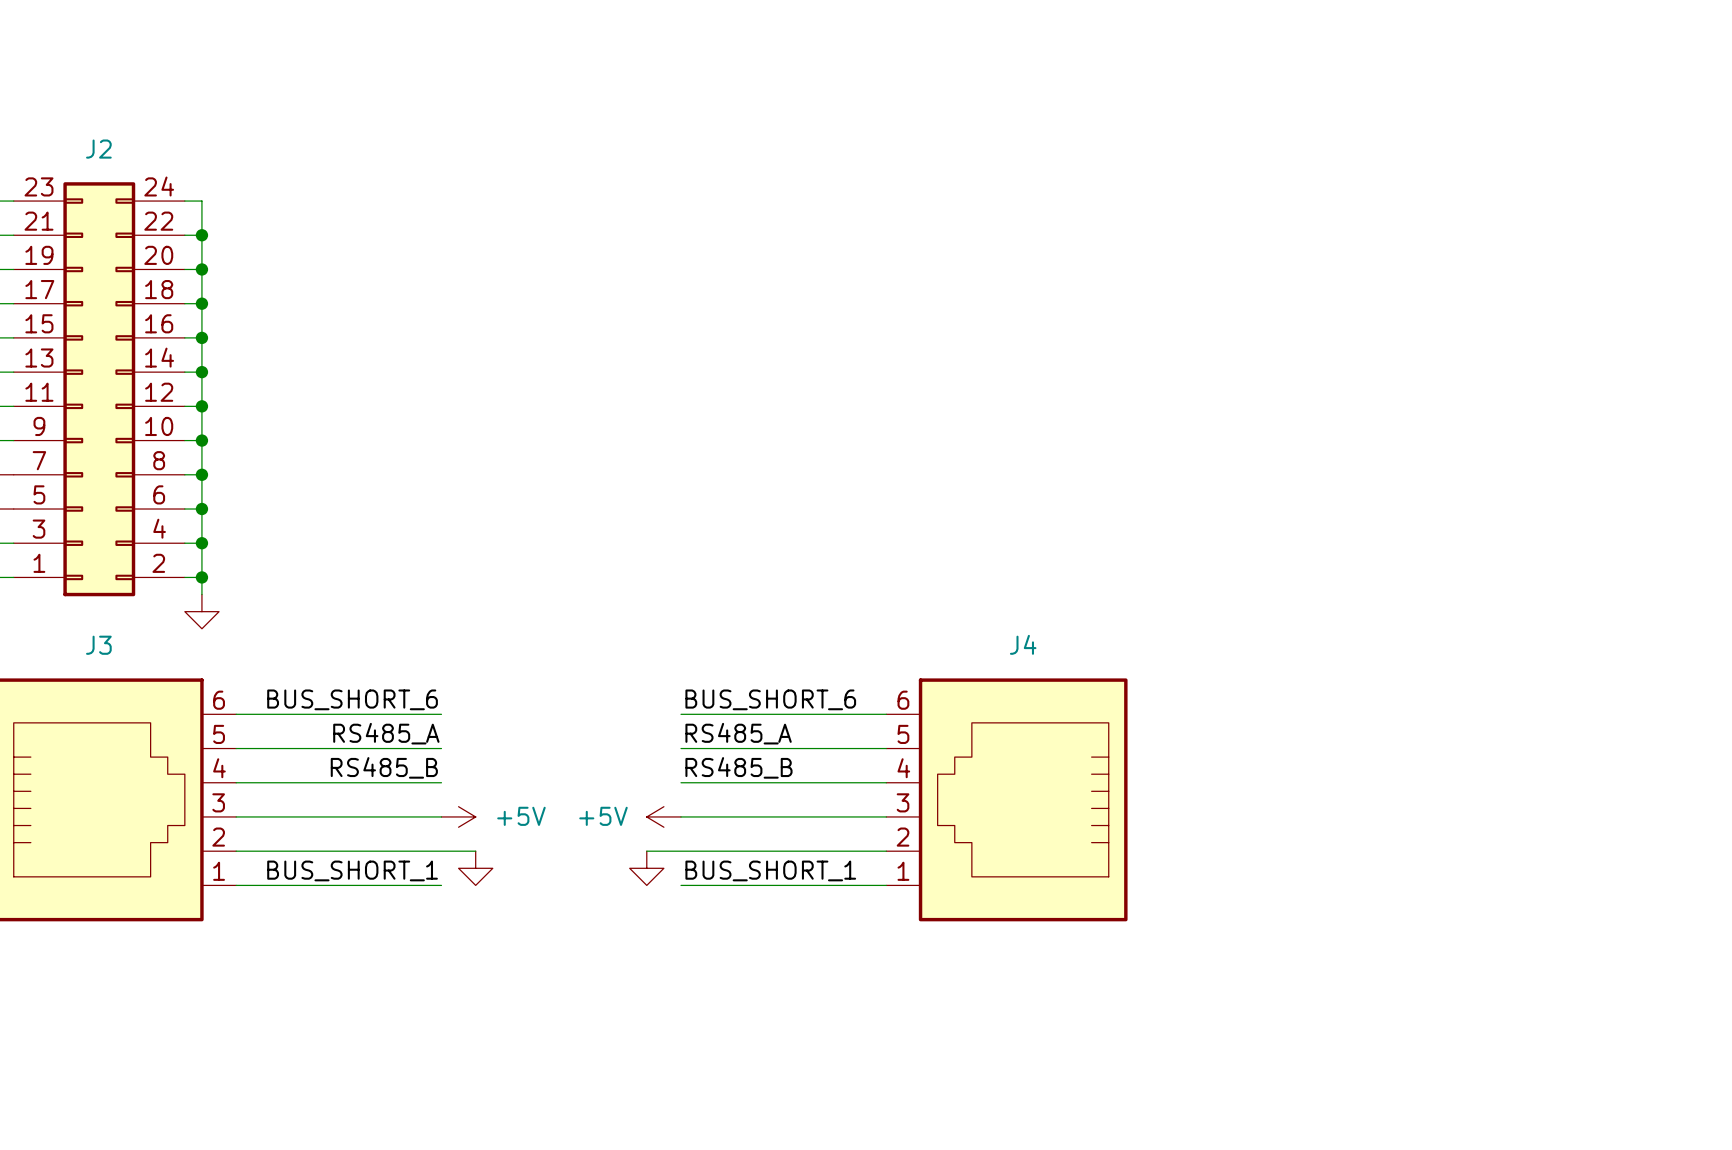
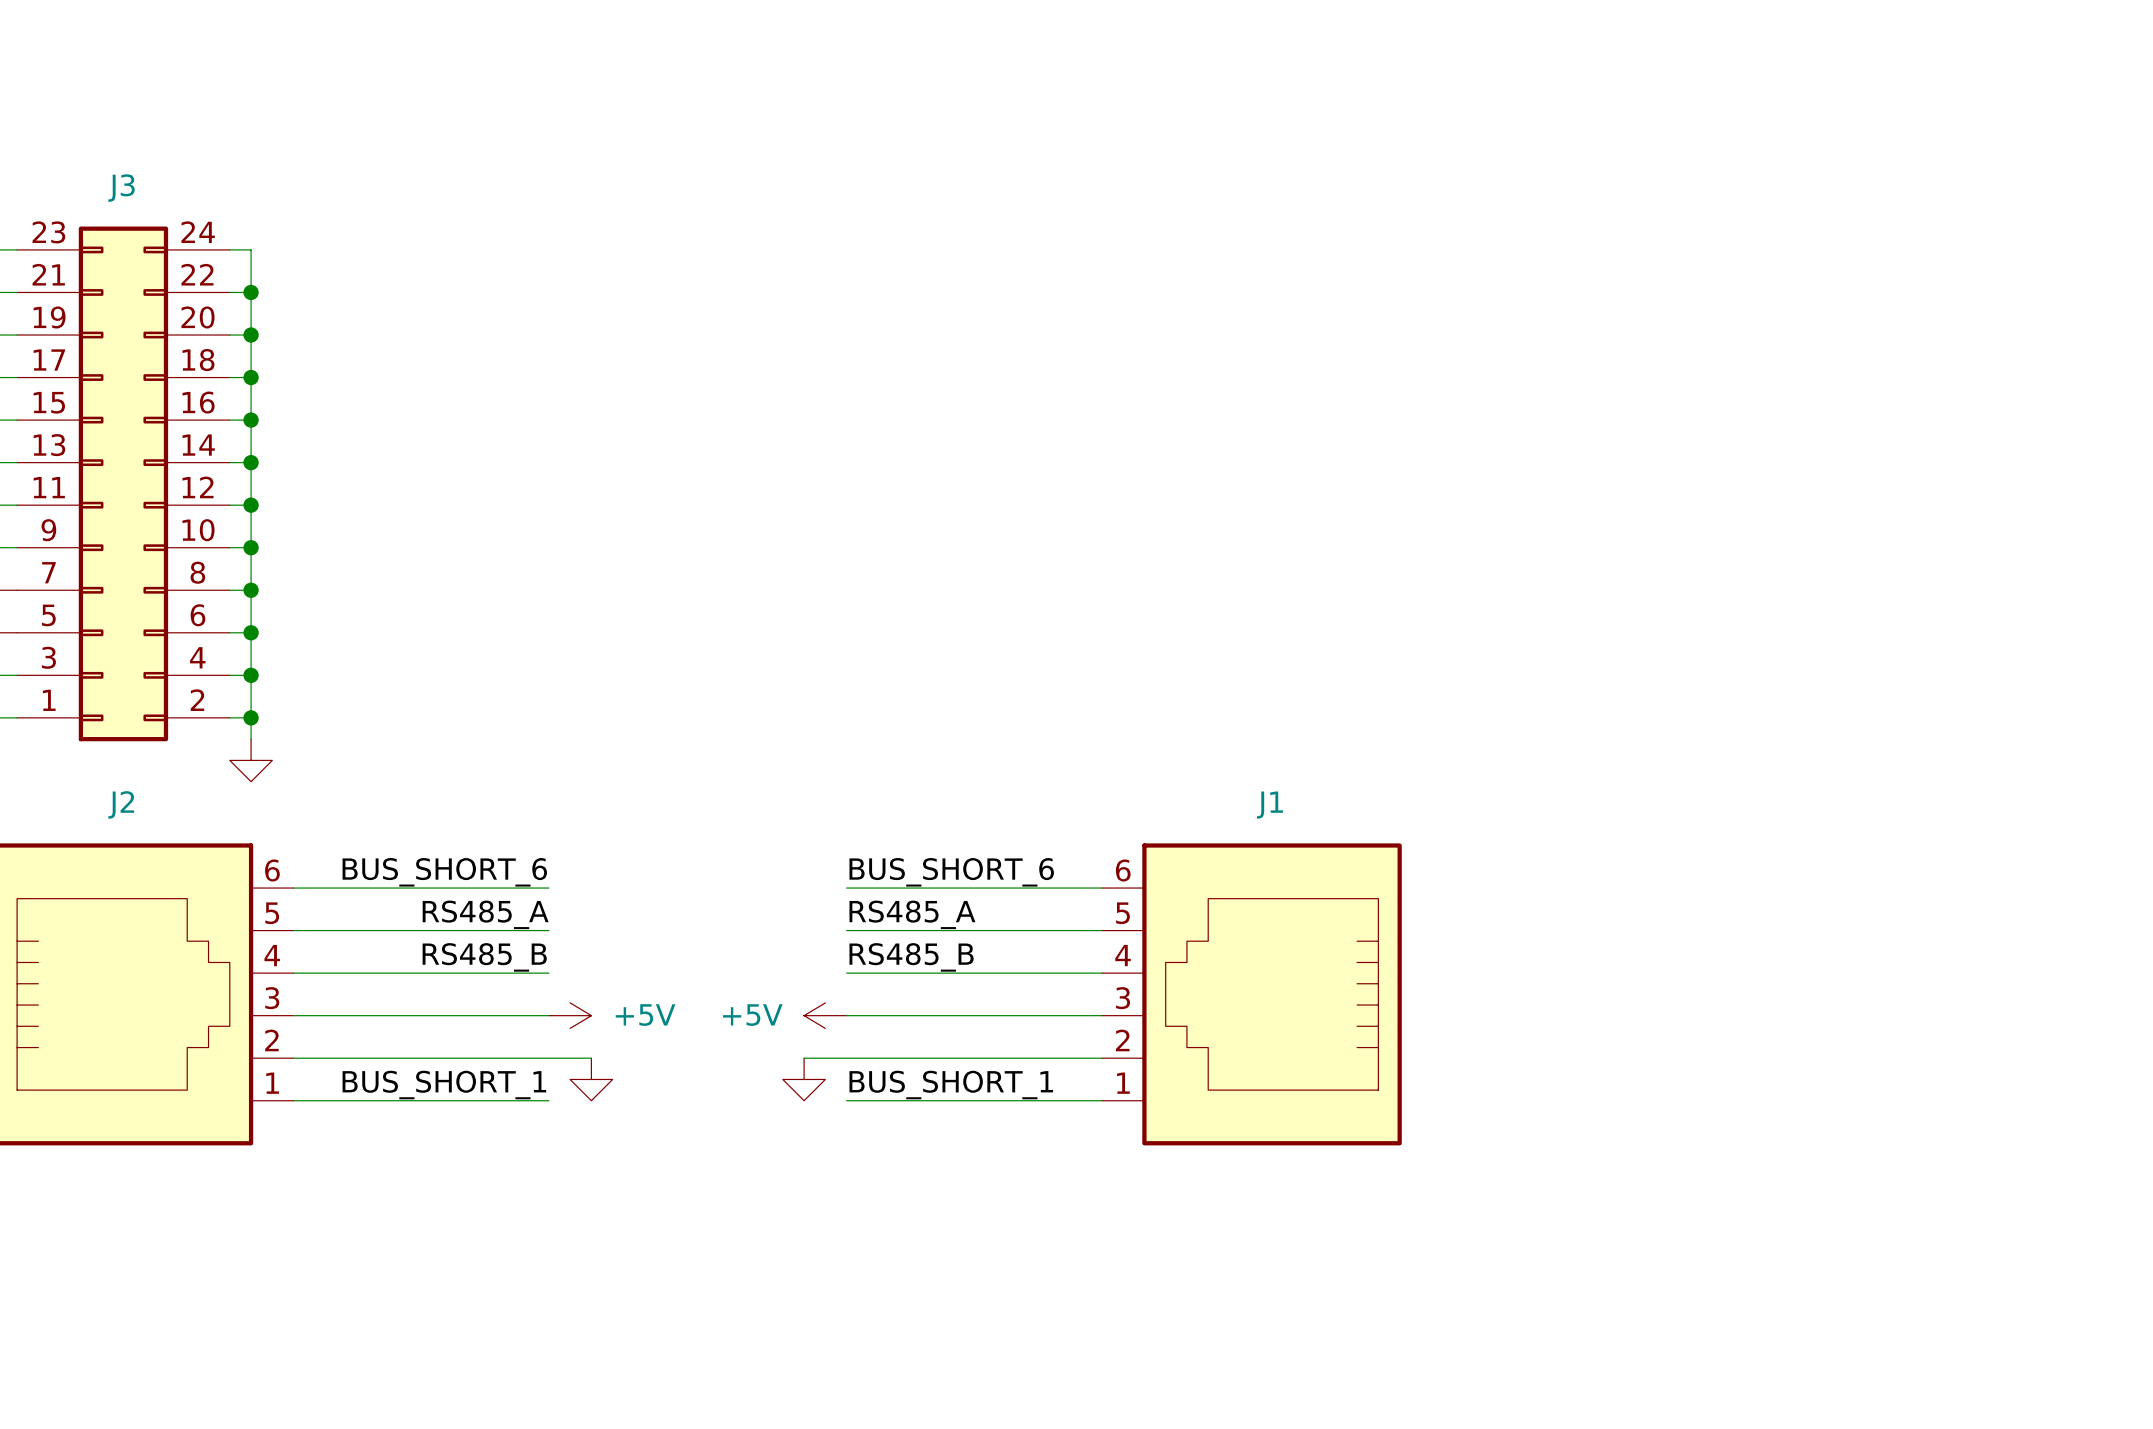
J2 name: J2 (98, 149) -> J3 (121, 188)
J4 name: J4 (1023, 644) -> J1 (1269, 805)
J3 name: J3 (98, 645) -> J2 (121, 804)

